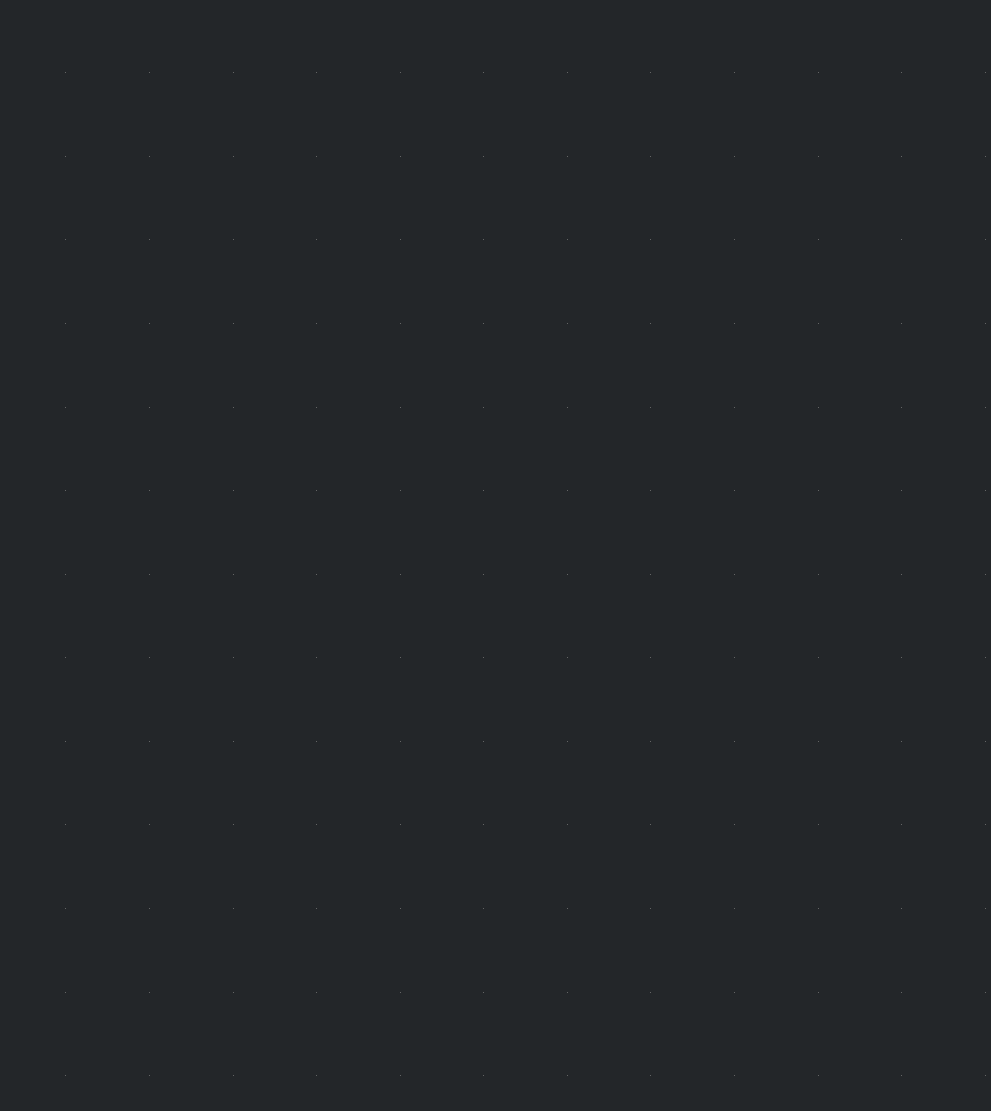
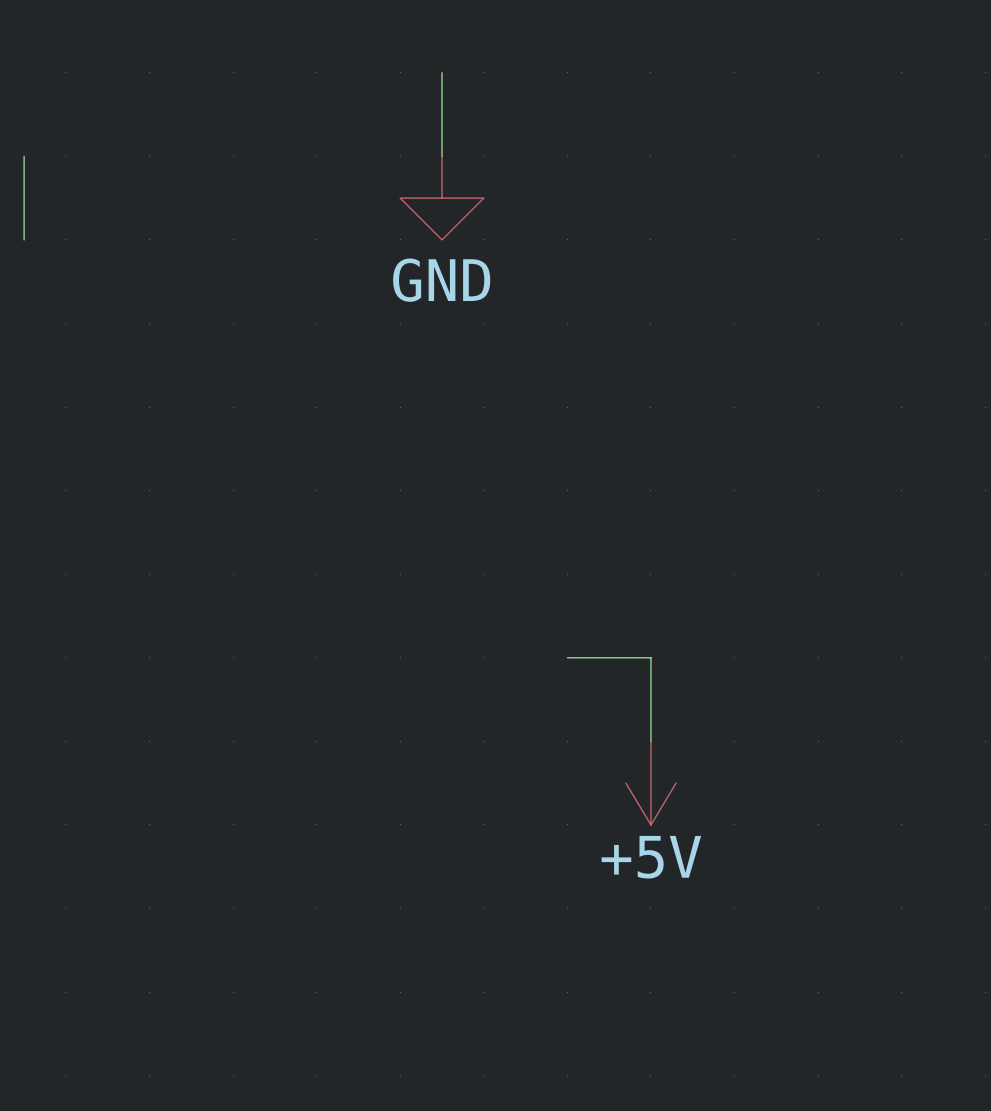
wire: none -> (442, 72) (442, 156)
wire: none -> (24, 156) (24, 239)
power symbol: none -> GND (442, 198)
wire: none -> (567, 657) (650, 657) (650, 741)
power symbol: none -> +5V (650, 783)

